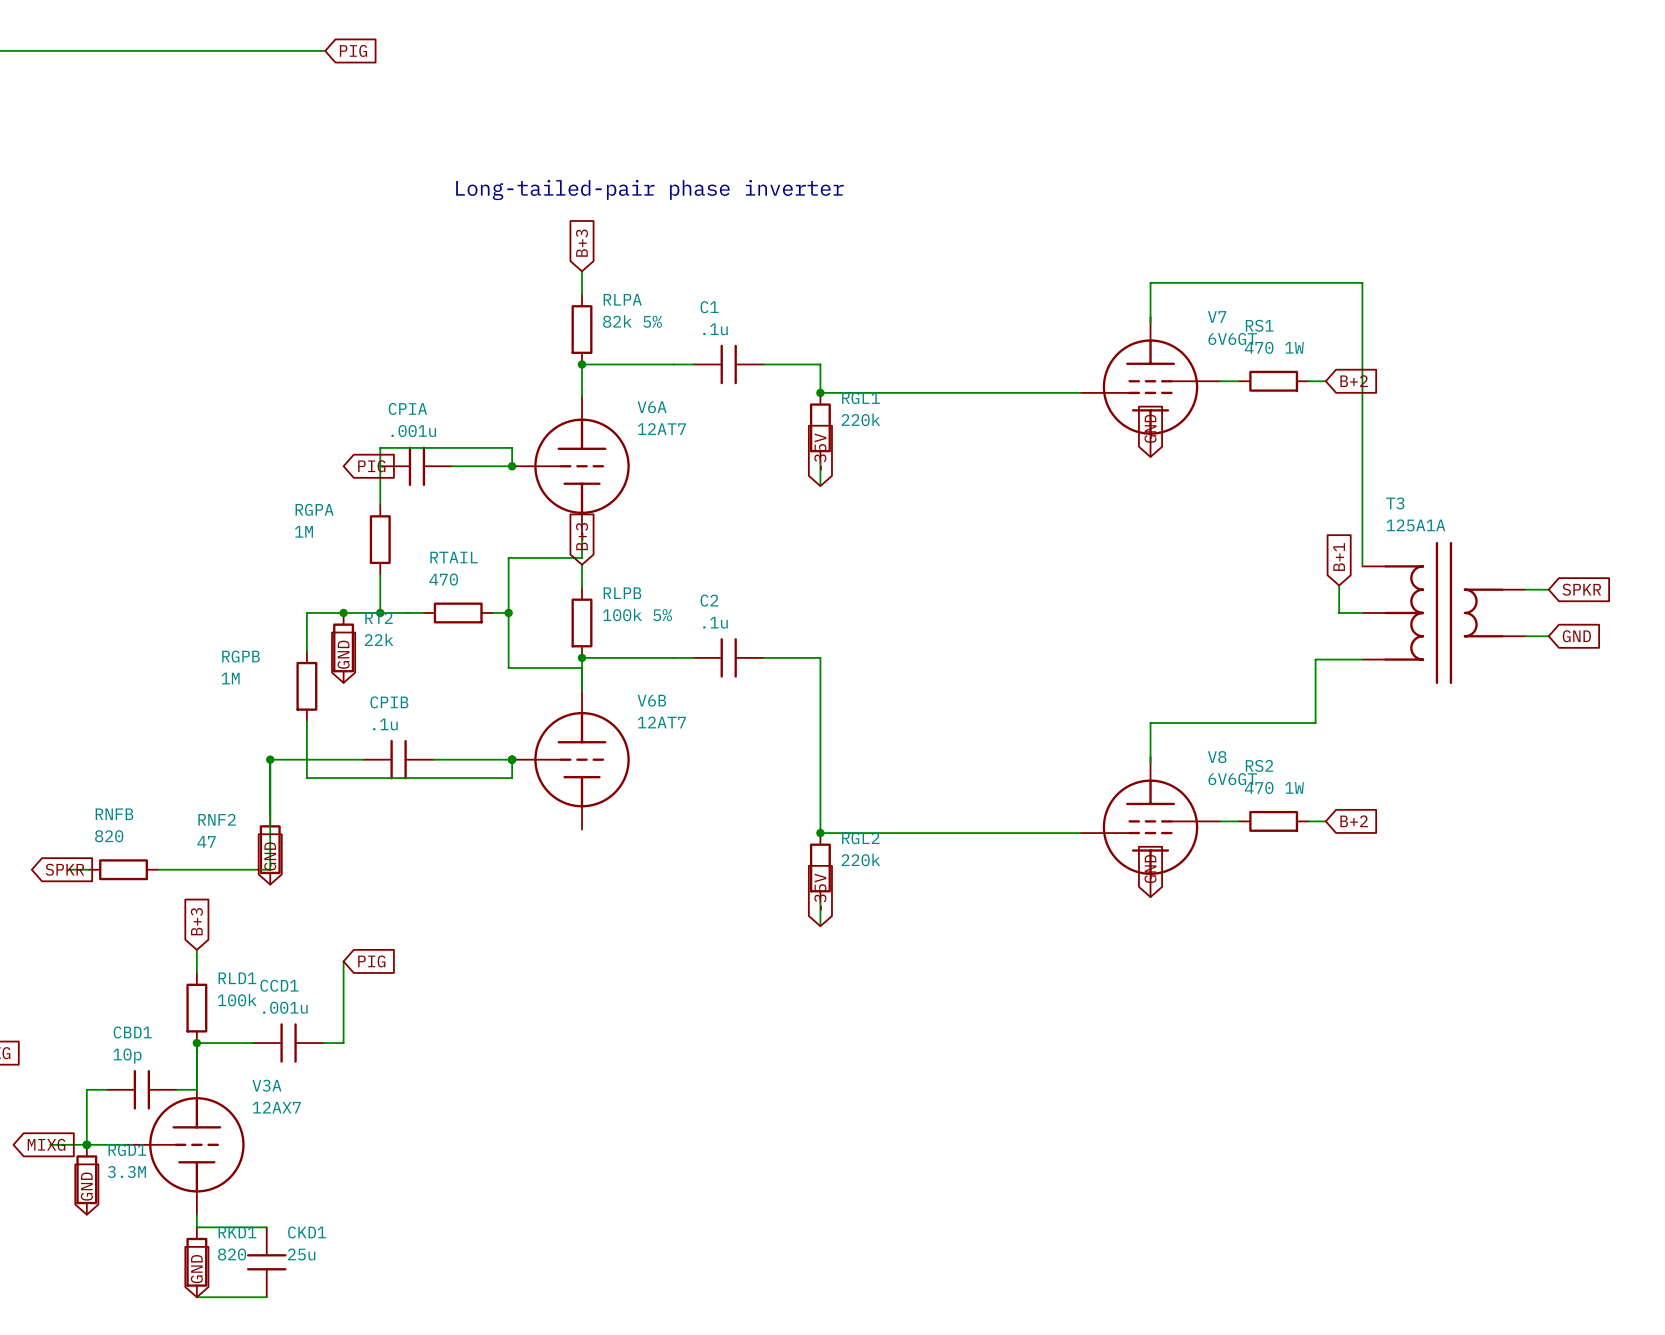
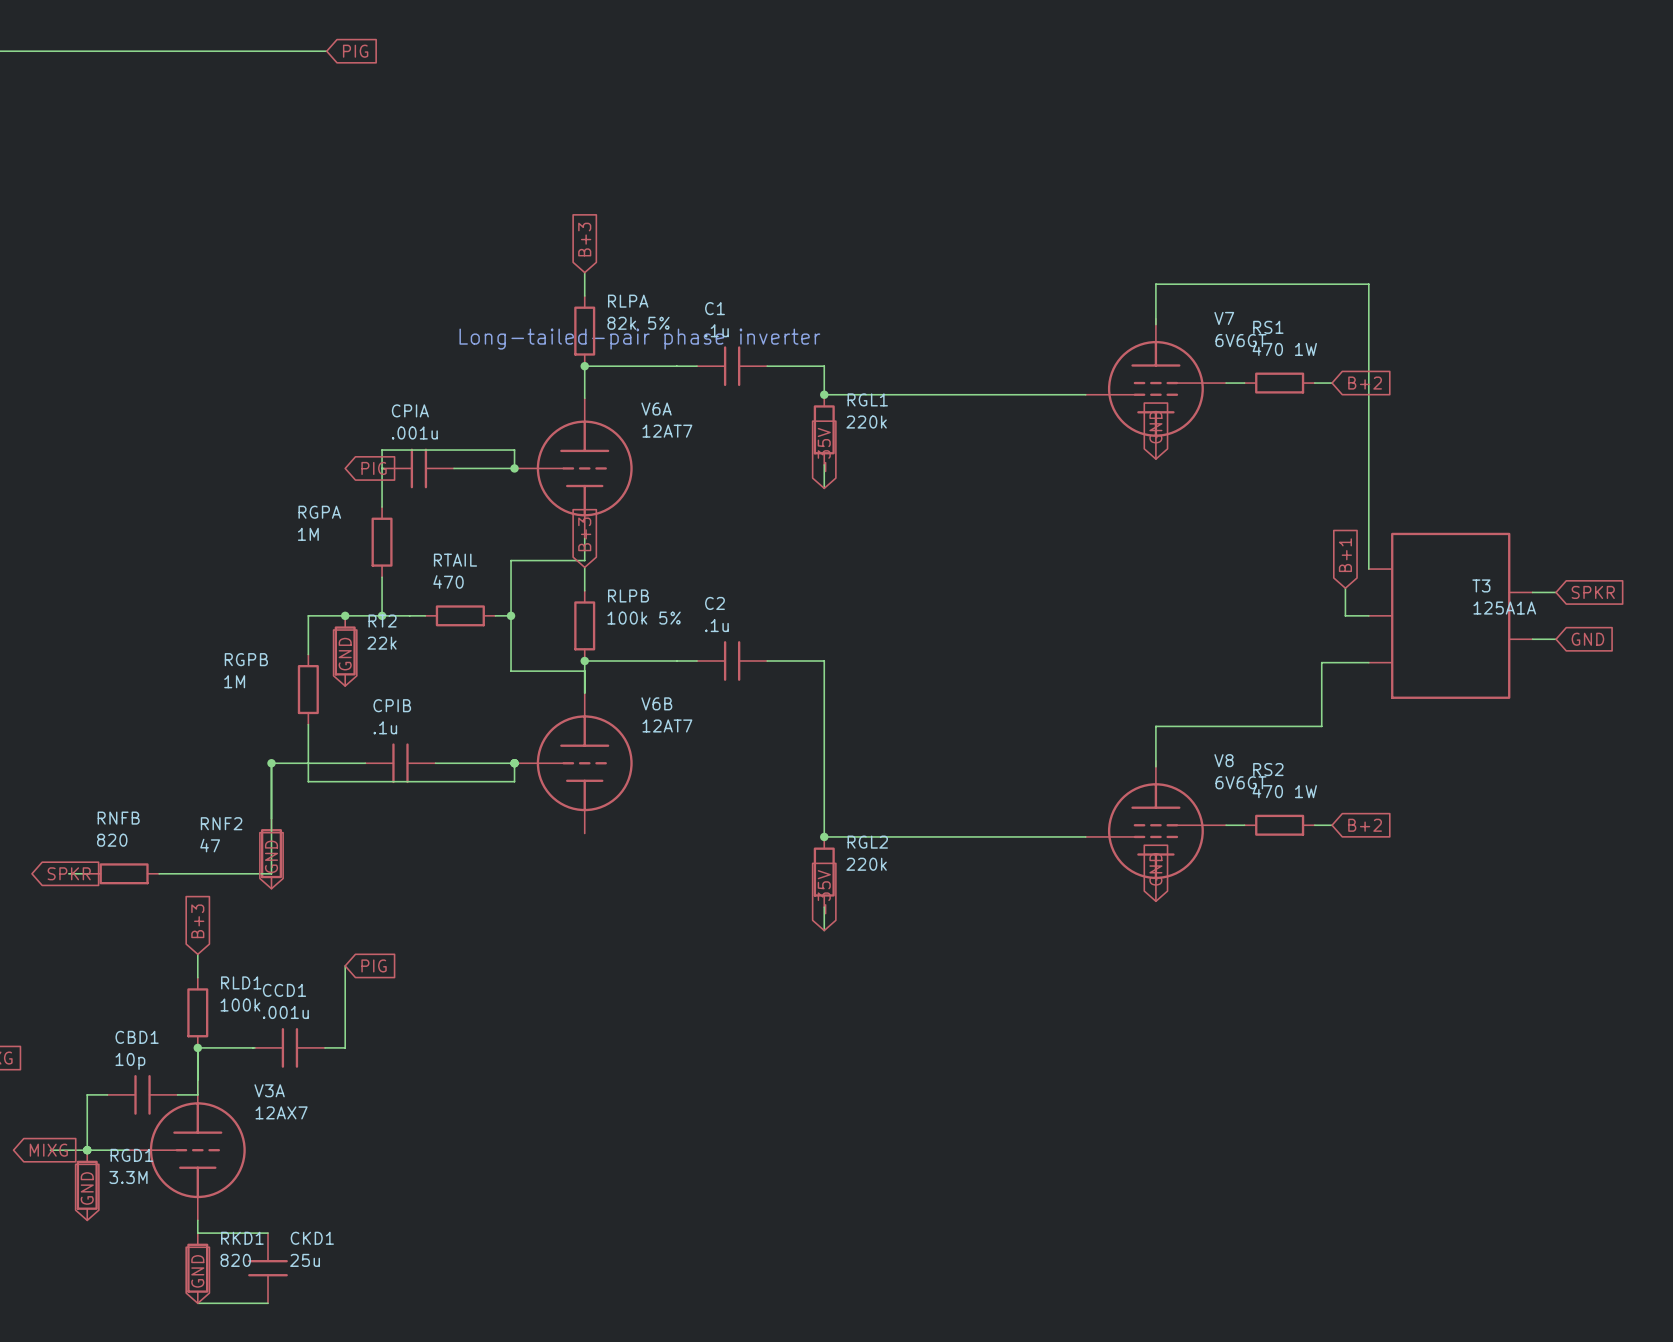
text position: Long-tailed-pair phase inverter (649, 190) -> Long-tailed-pair phase inverter (639, 339)
T3 name position: T3 (1395, 503) -> T3 (1481, 585)
T3 value position: 125A1A (1415, 525) -> 125A1A (1504, 608)
T3 symbol: [1362, 541, 1526, 685] -> [1368, 532, 1533, 699]

